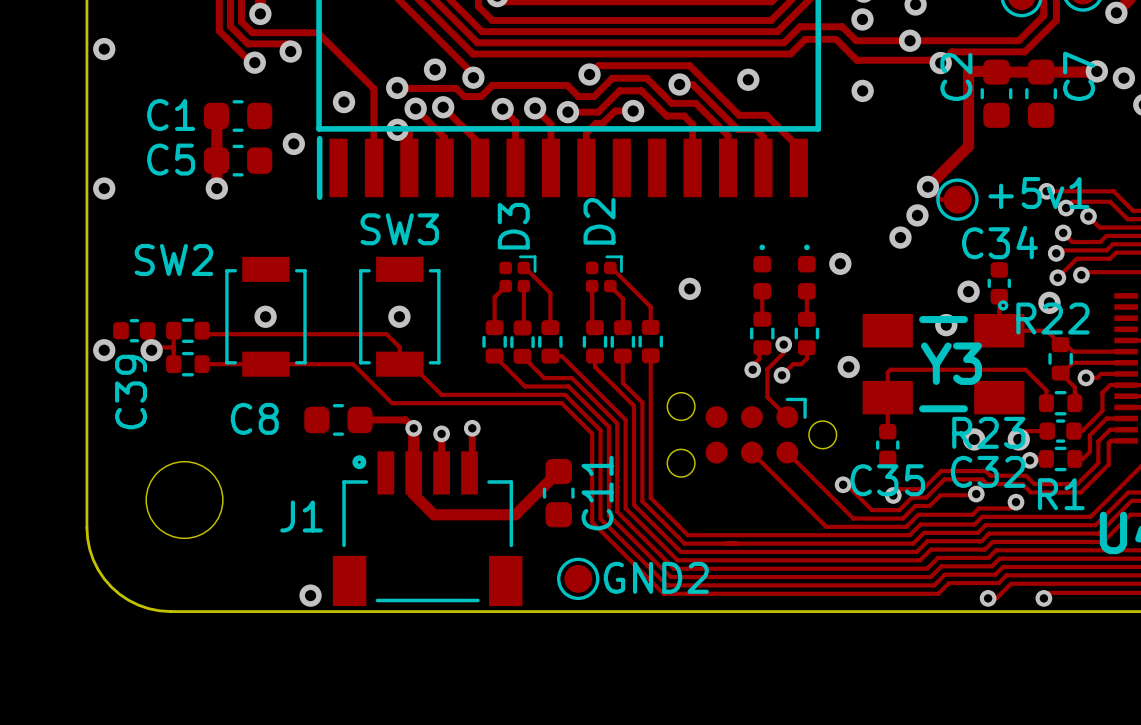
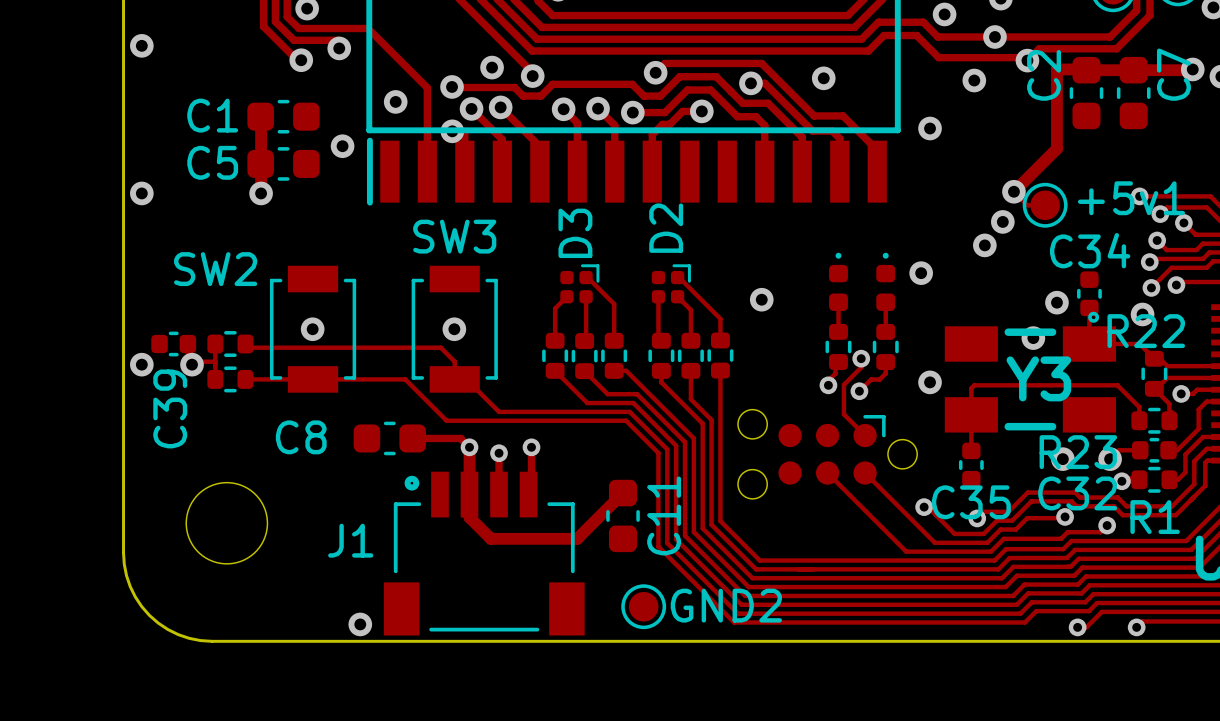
via: none -> (974, 80)
via: (862, 90) -> none
via: none -> (930, 128)

